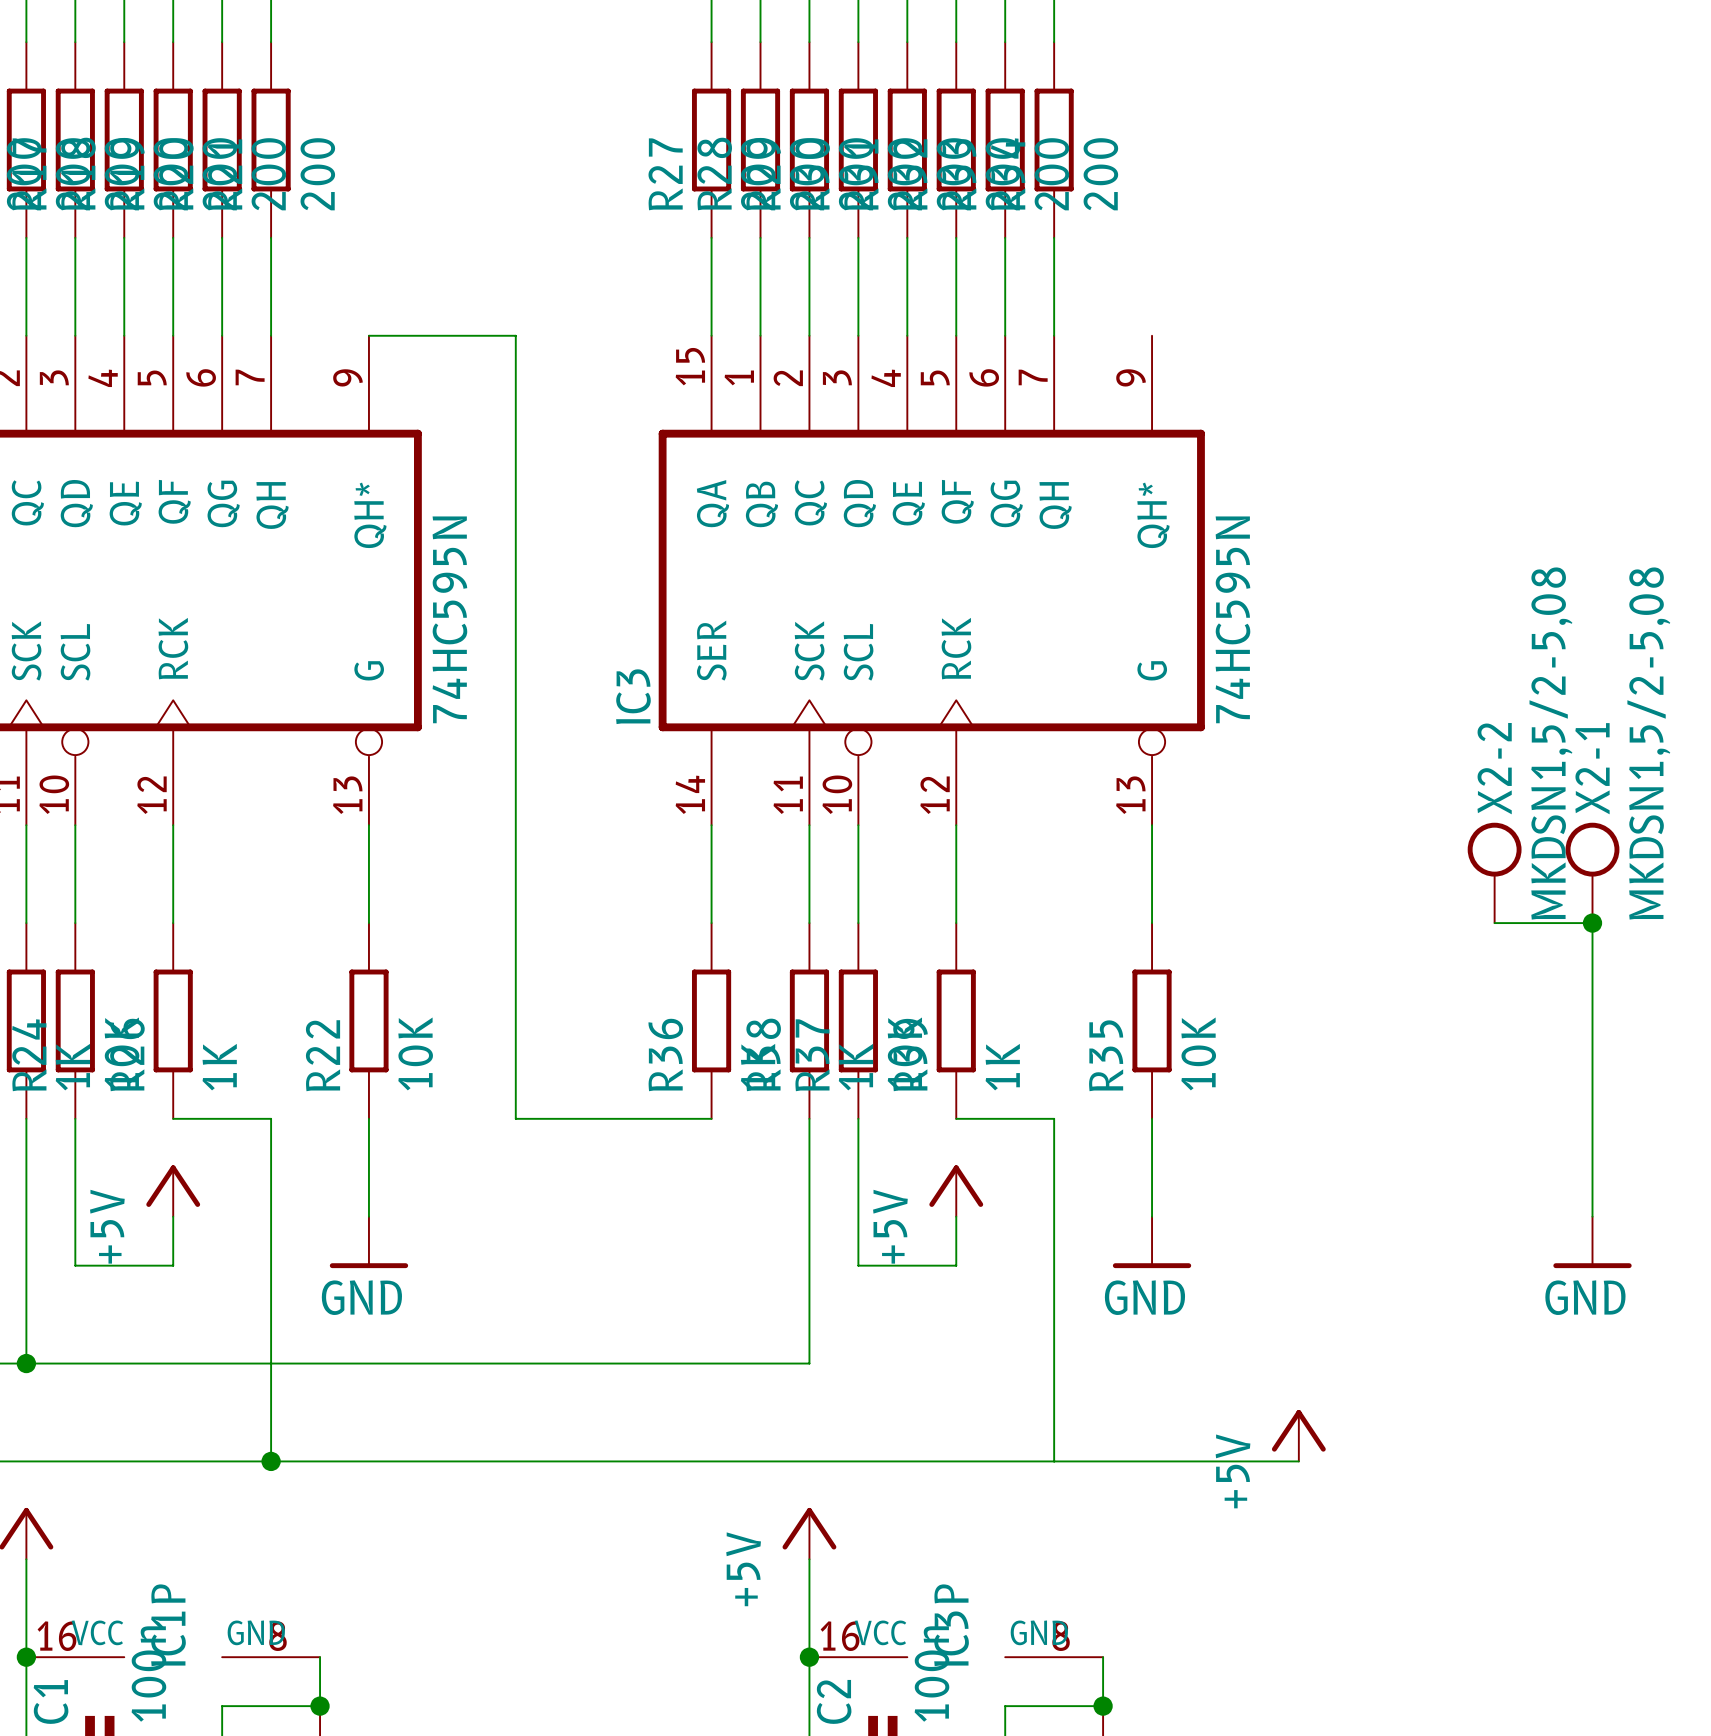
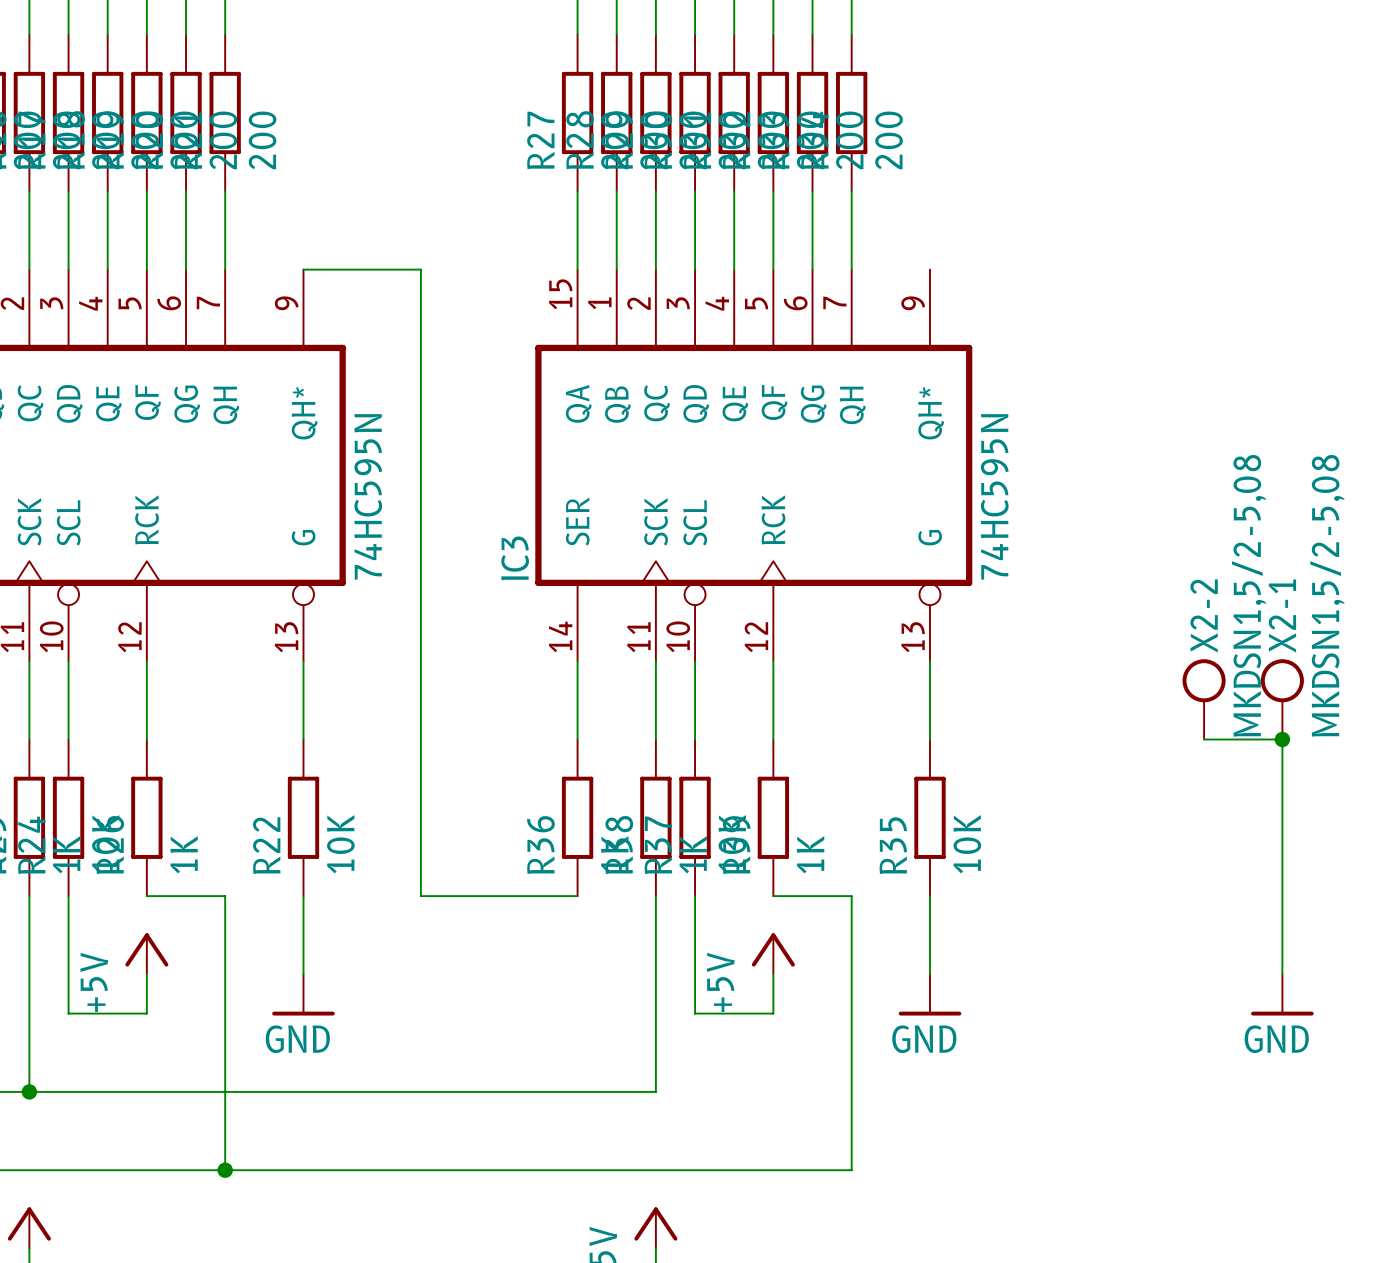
power symbol: +5V (1298, 1435) -> none
wire: (1054, 1461) (1298, 1461) -> none

